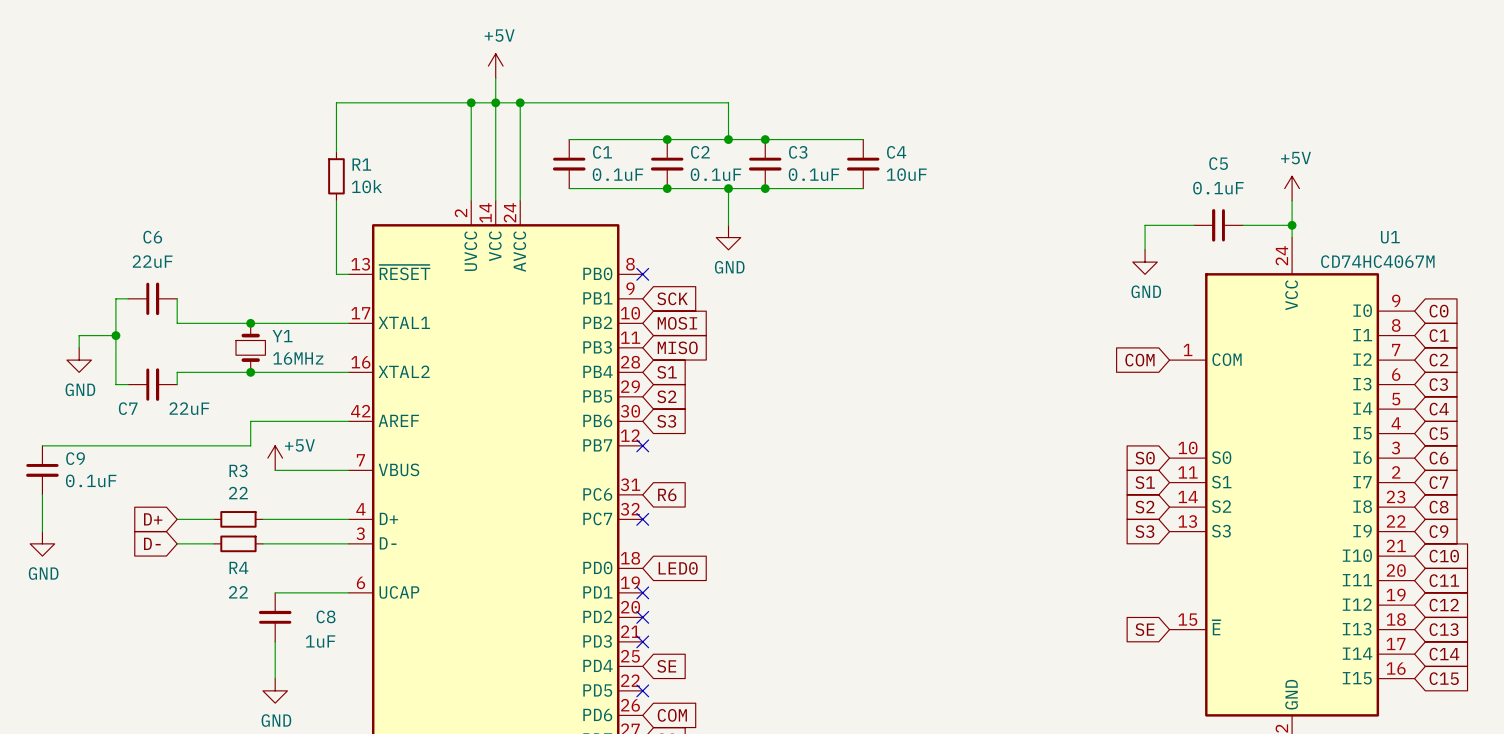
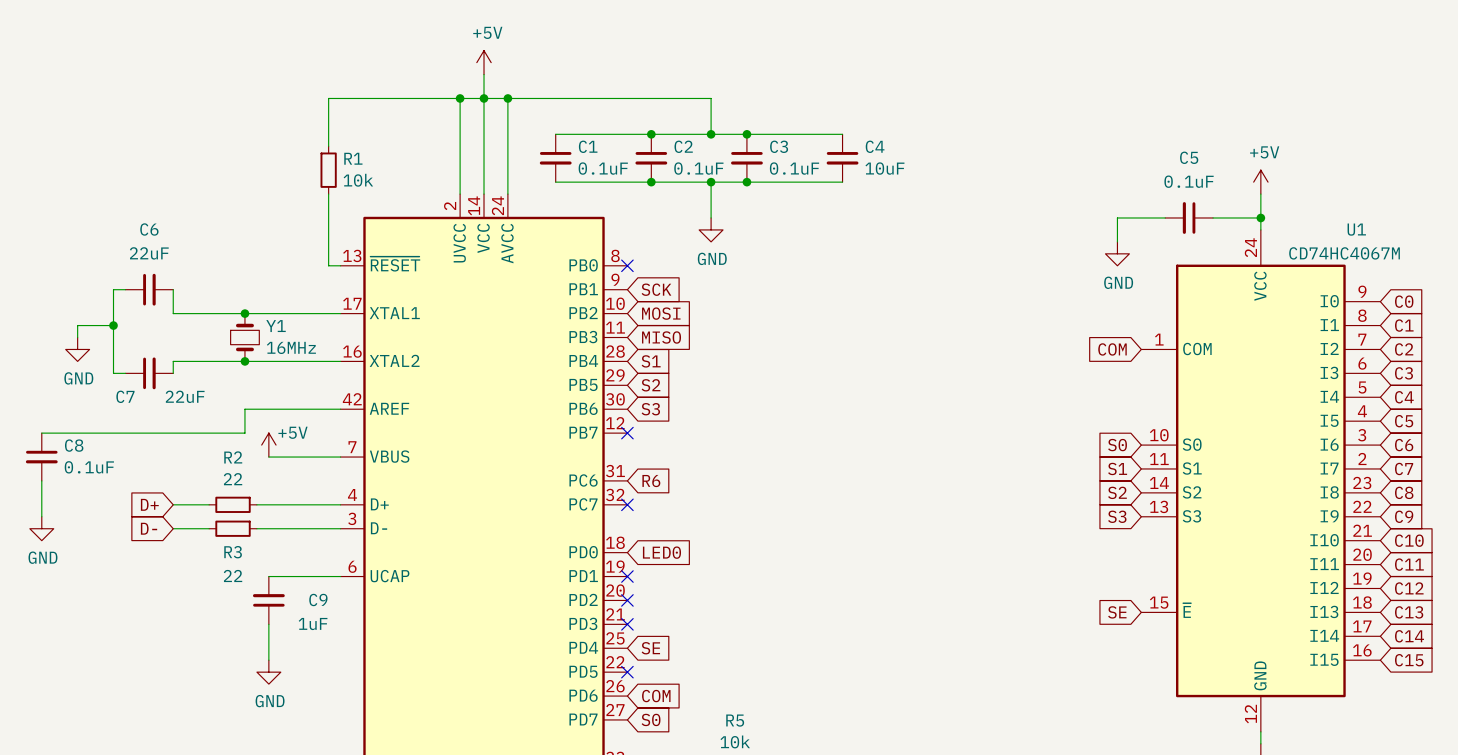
C9 name: C9 (75, 458) -> C8 (74, 445)
R3 name: R3 (238, 470) -> R2 (233, 457)
R4 name: R4 (238, 567) -> R3 (233, 552)
C8 name: C8 (326, 616) -> C9 (318, 599)

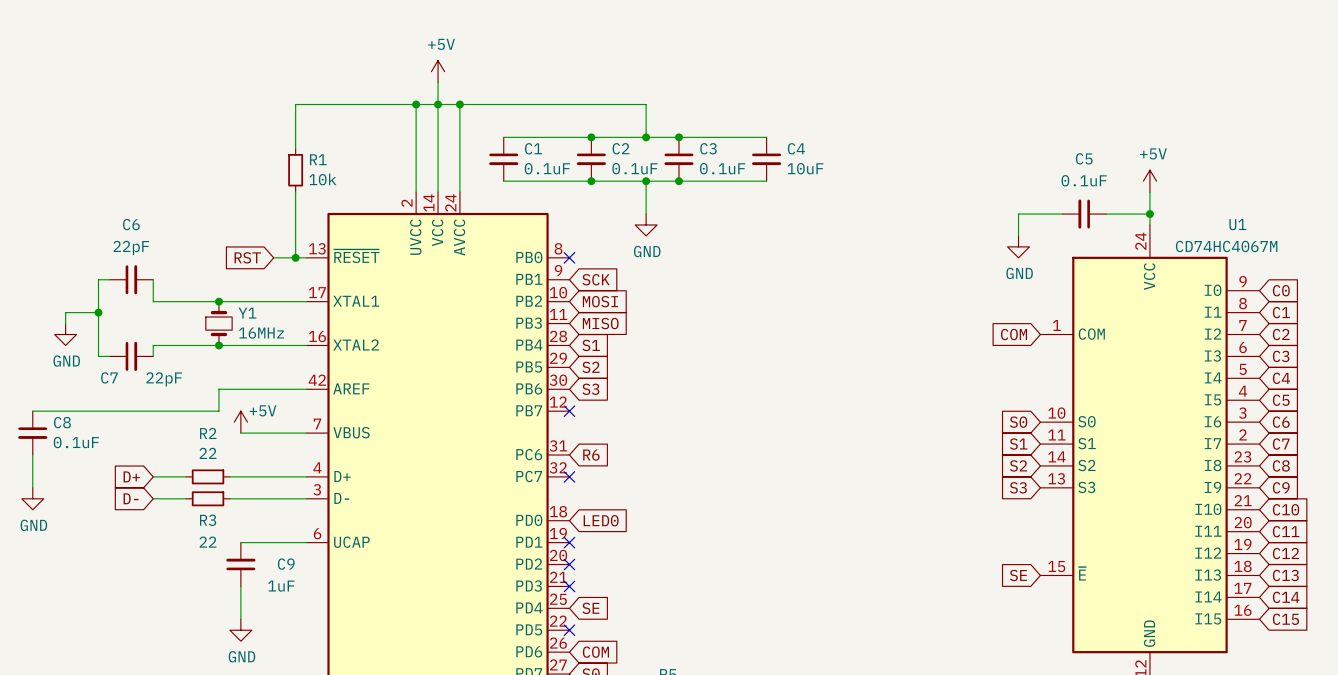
C6 value: 22uF (149, 253) -> 22pF (131, 247)
global label: none -> RST (247, 257)
wire: none -> (273, 257) (295, 257)
junction: none -> (295, 257)
C7 value: 22uF (185, 396) -> 22pF (164, 379)

